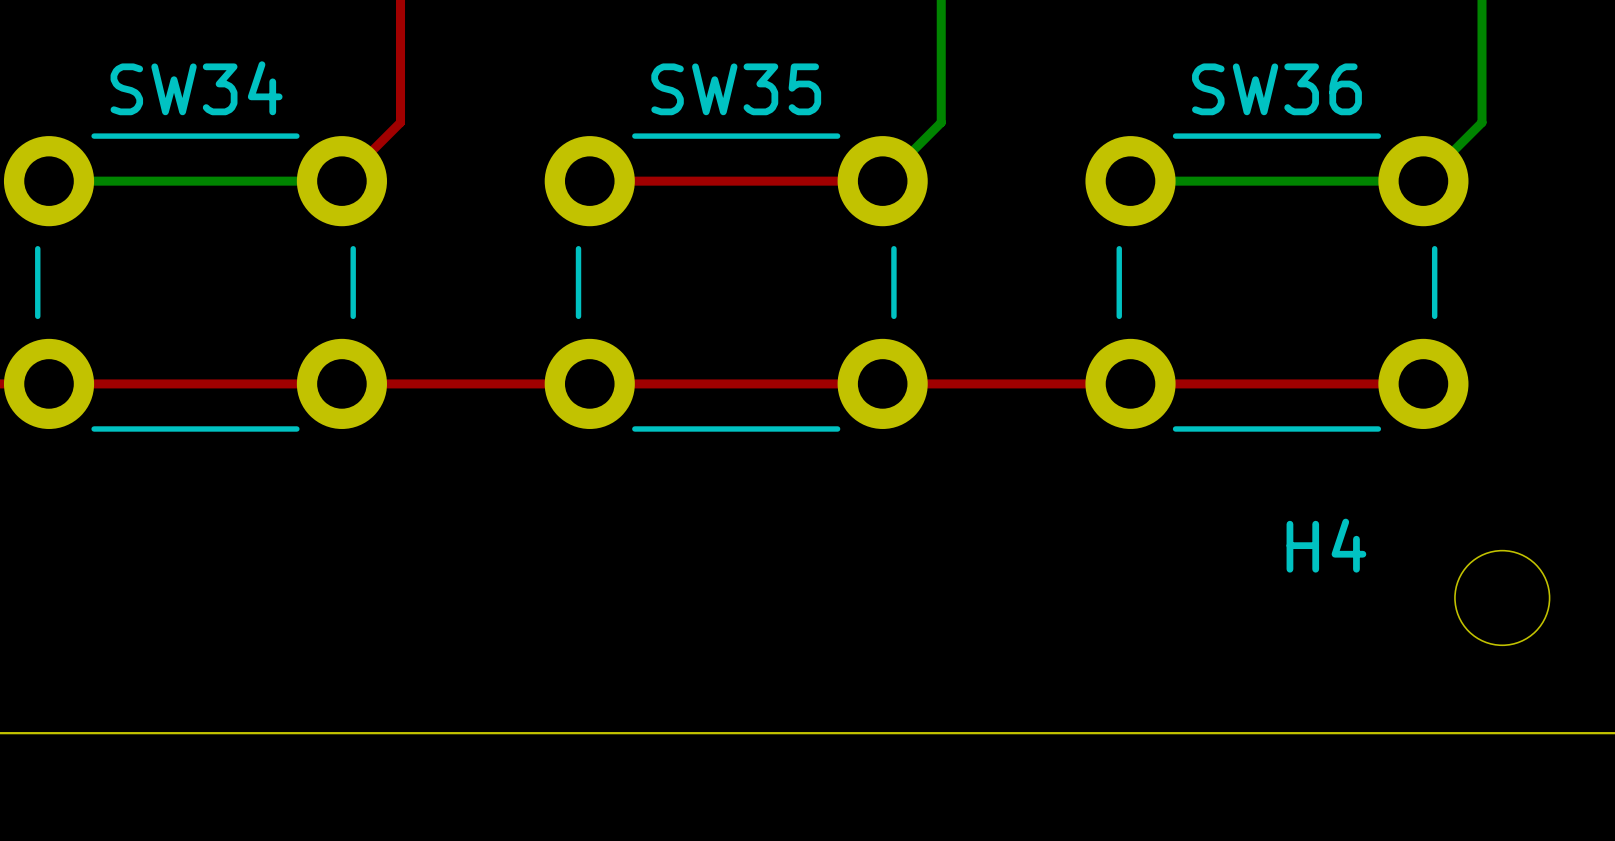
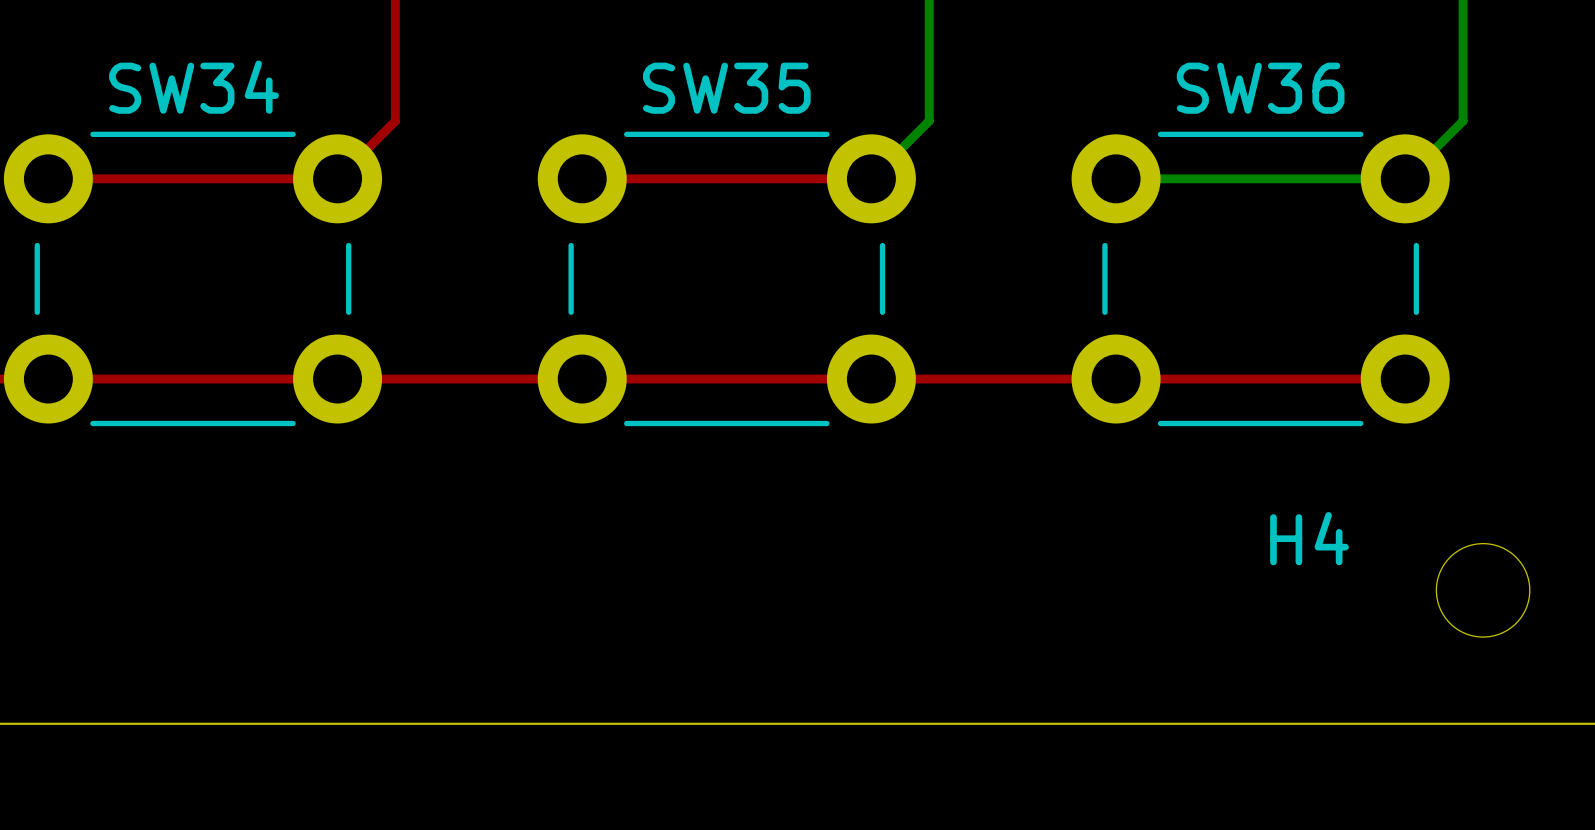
top track: none -> (48, 178) (337, 178)
bottom track: (49, 181) (341, 181) -> none

